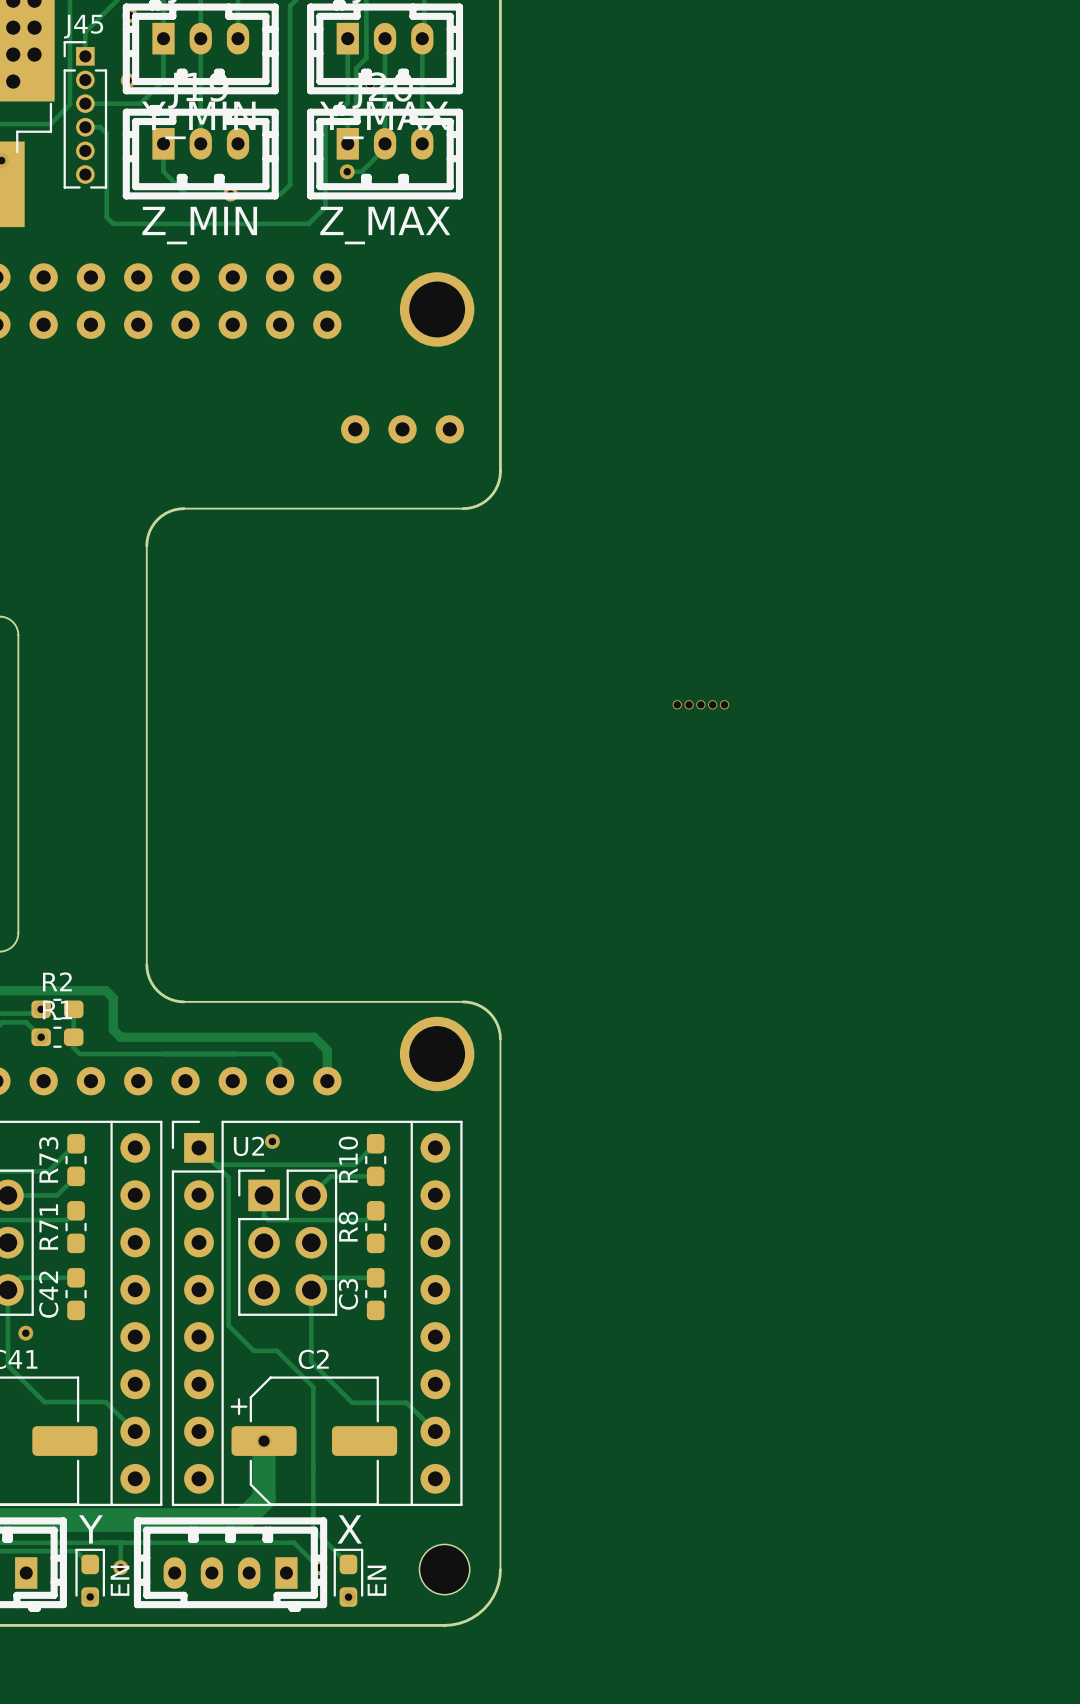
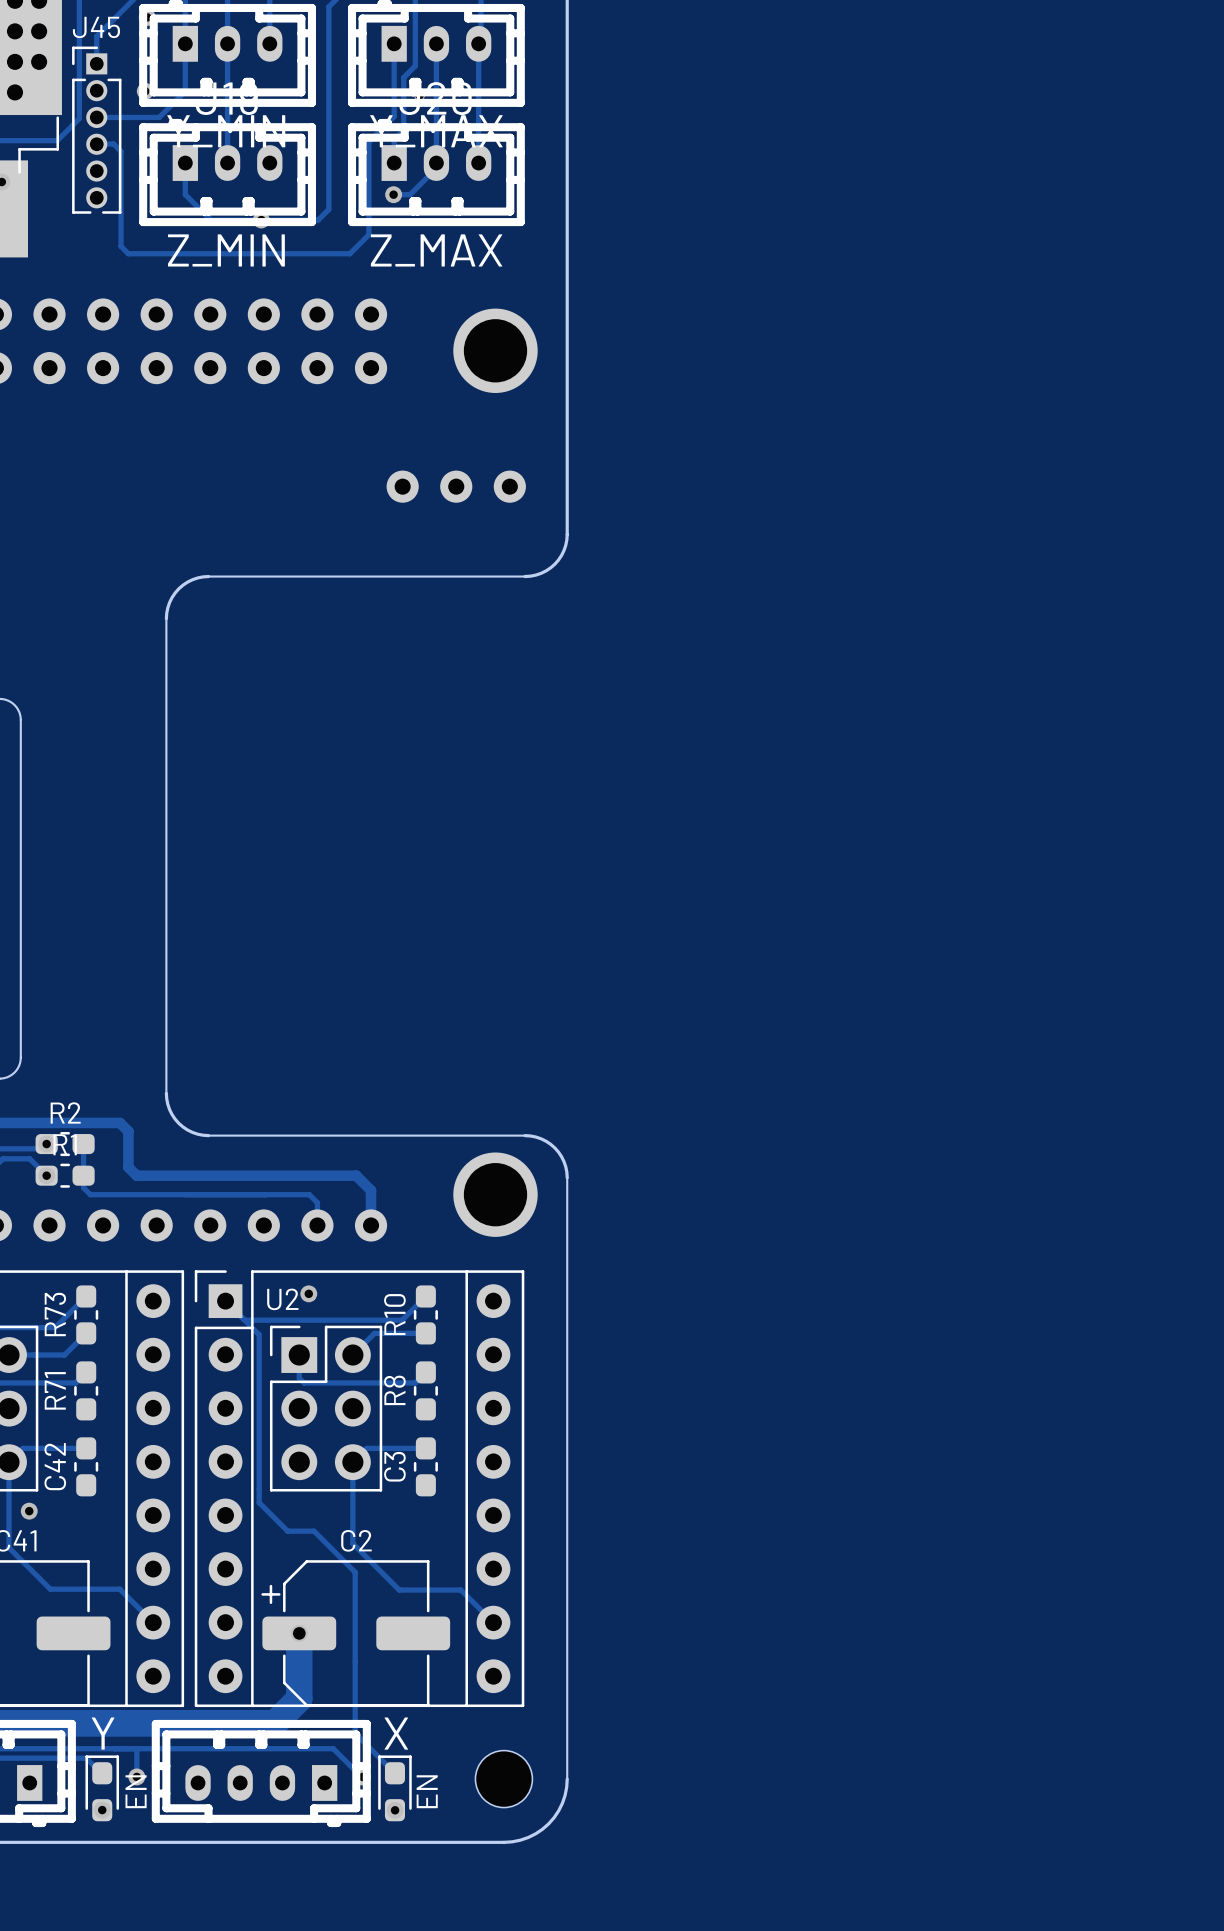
via: (677, 704) -> none
via: (689, 704) -> none
via: (700, 704) -> none
via: (712, 704) -> none
via: (724, 704) -> none

